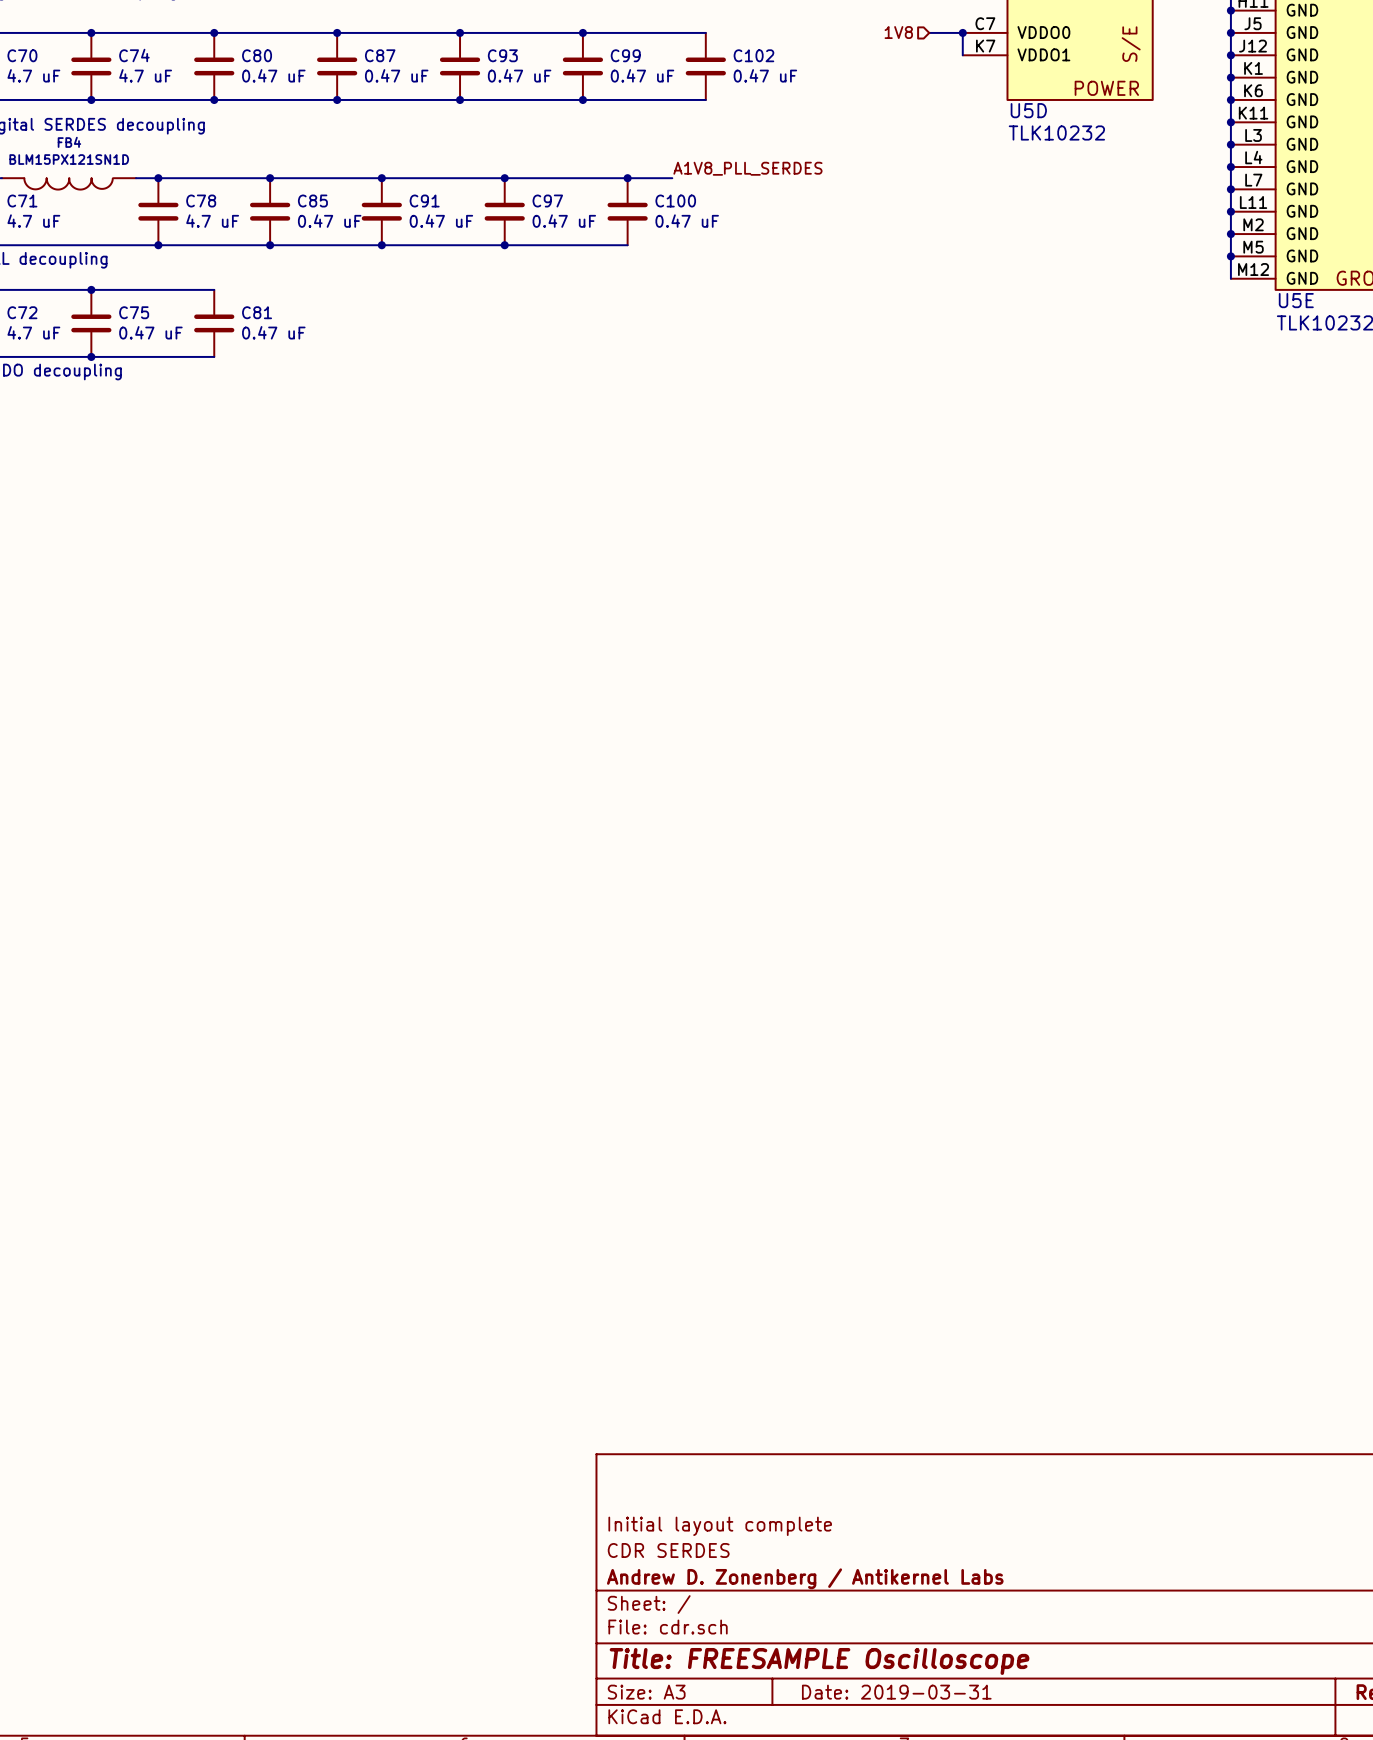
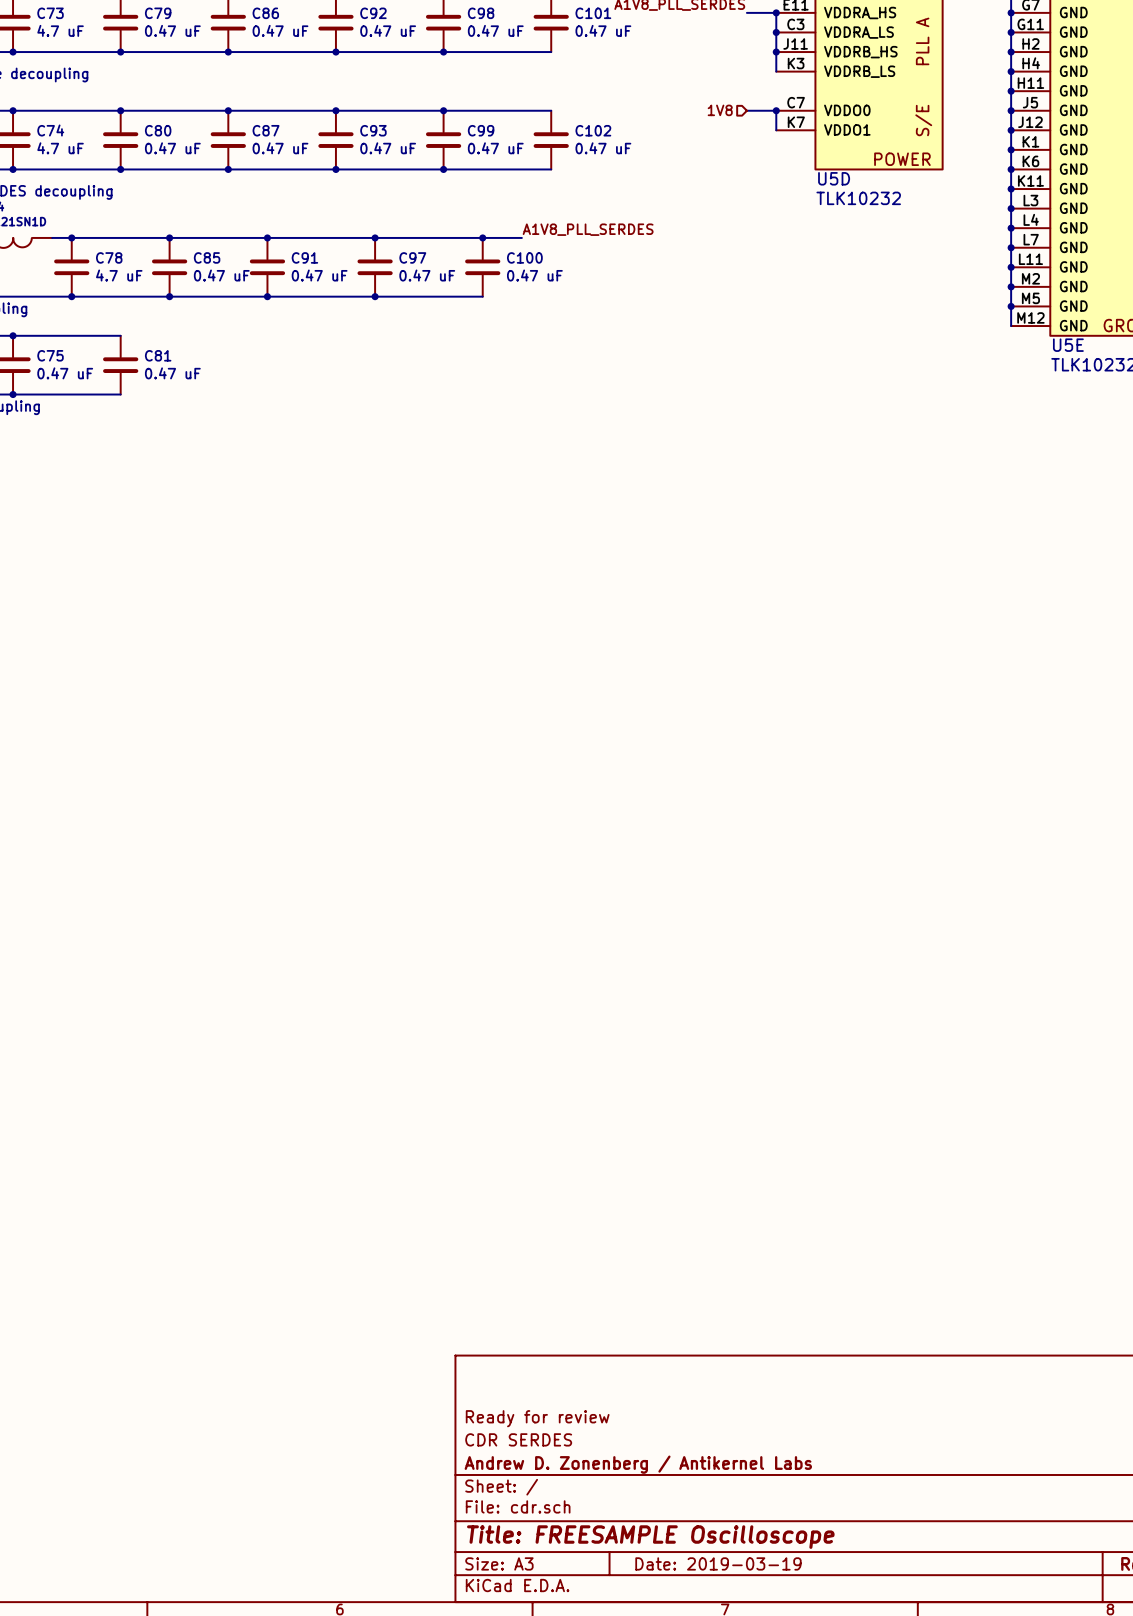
title block: Initial layout complete (720, 1526) -> Ready for review (537, 1418)
title block: Date: 2019-03-31 (896, 1692) -> Date: 2019-03-19 (718, 1563)

